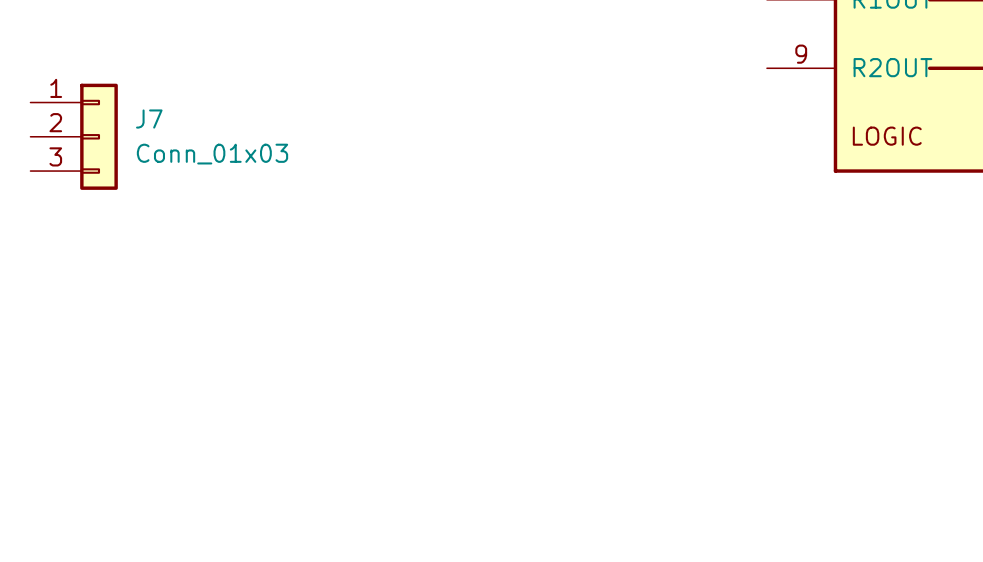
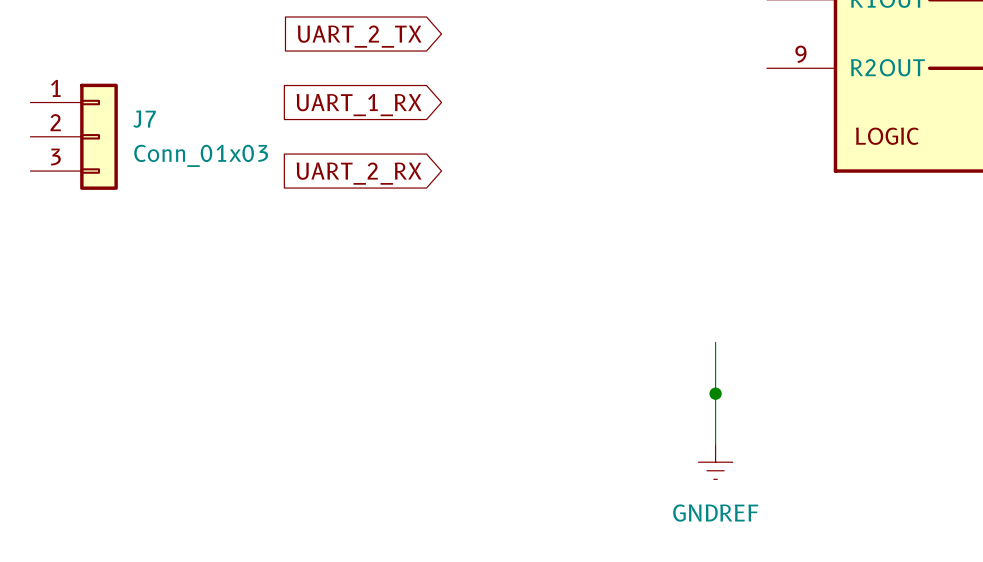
global label: none -> UART_2_TX (359, 36)
global label: none -> UART_1_RX (359, 105)
global label: none -> UART_2_RX (359, 173)
wire: none -> (715, 342) (715, 445)
junction: none -> (715, 393)
power symbol: none -> GNDREF (715, 462)

